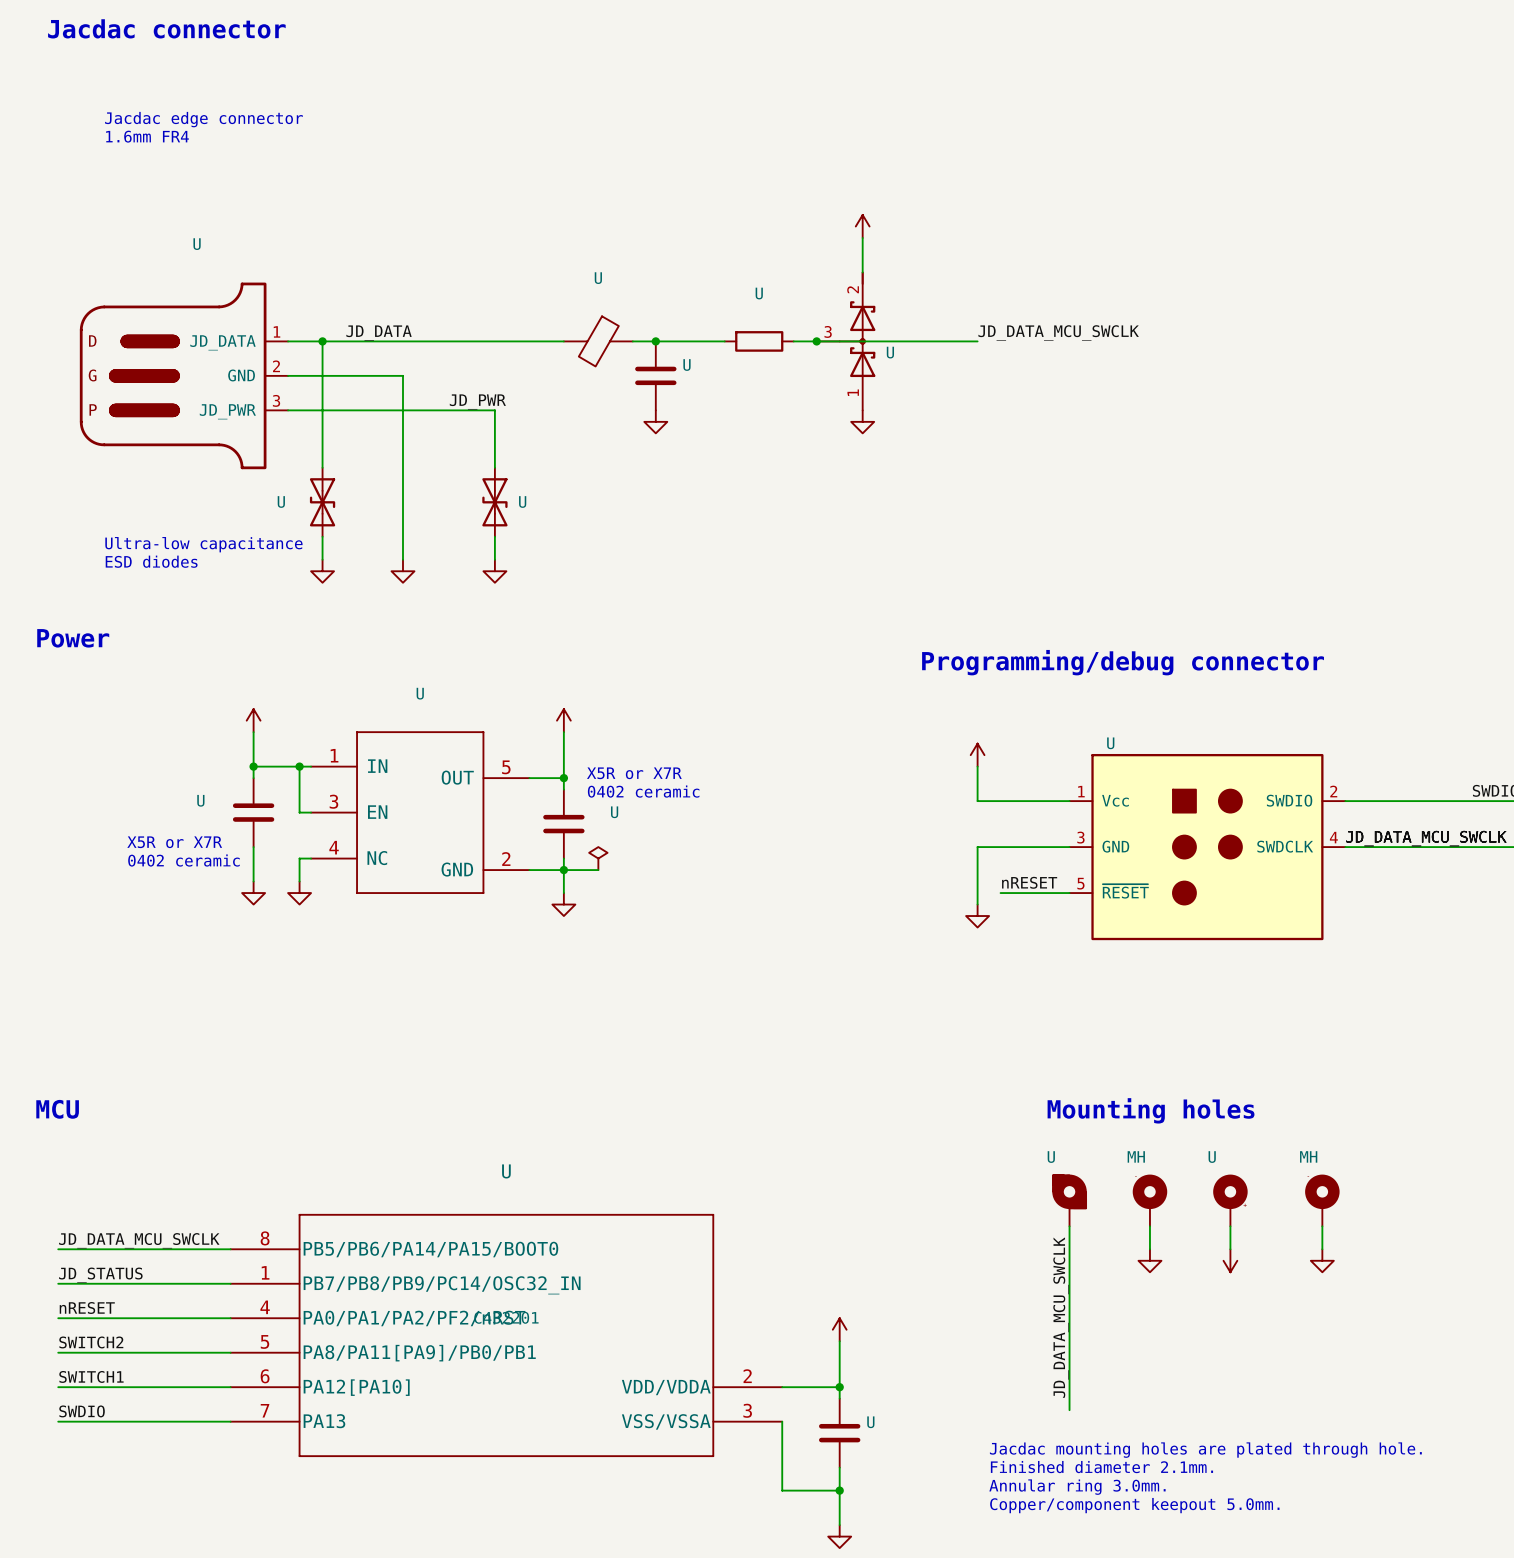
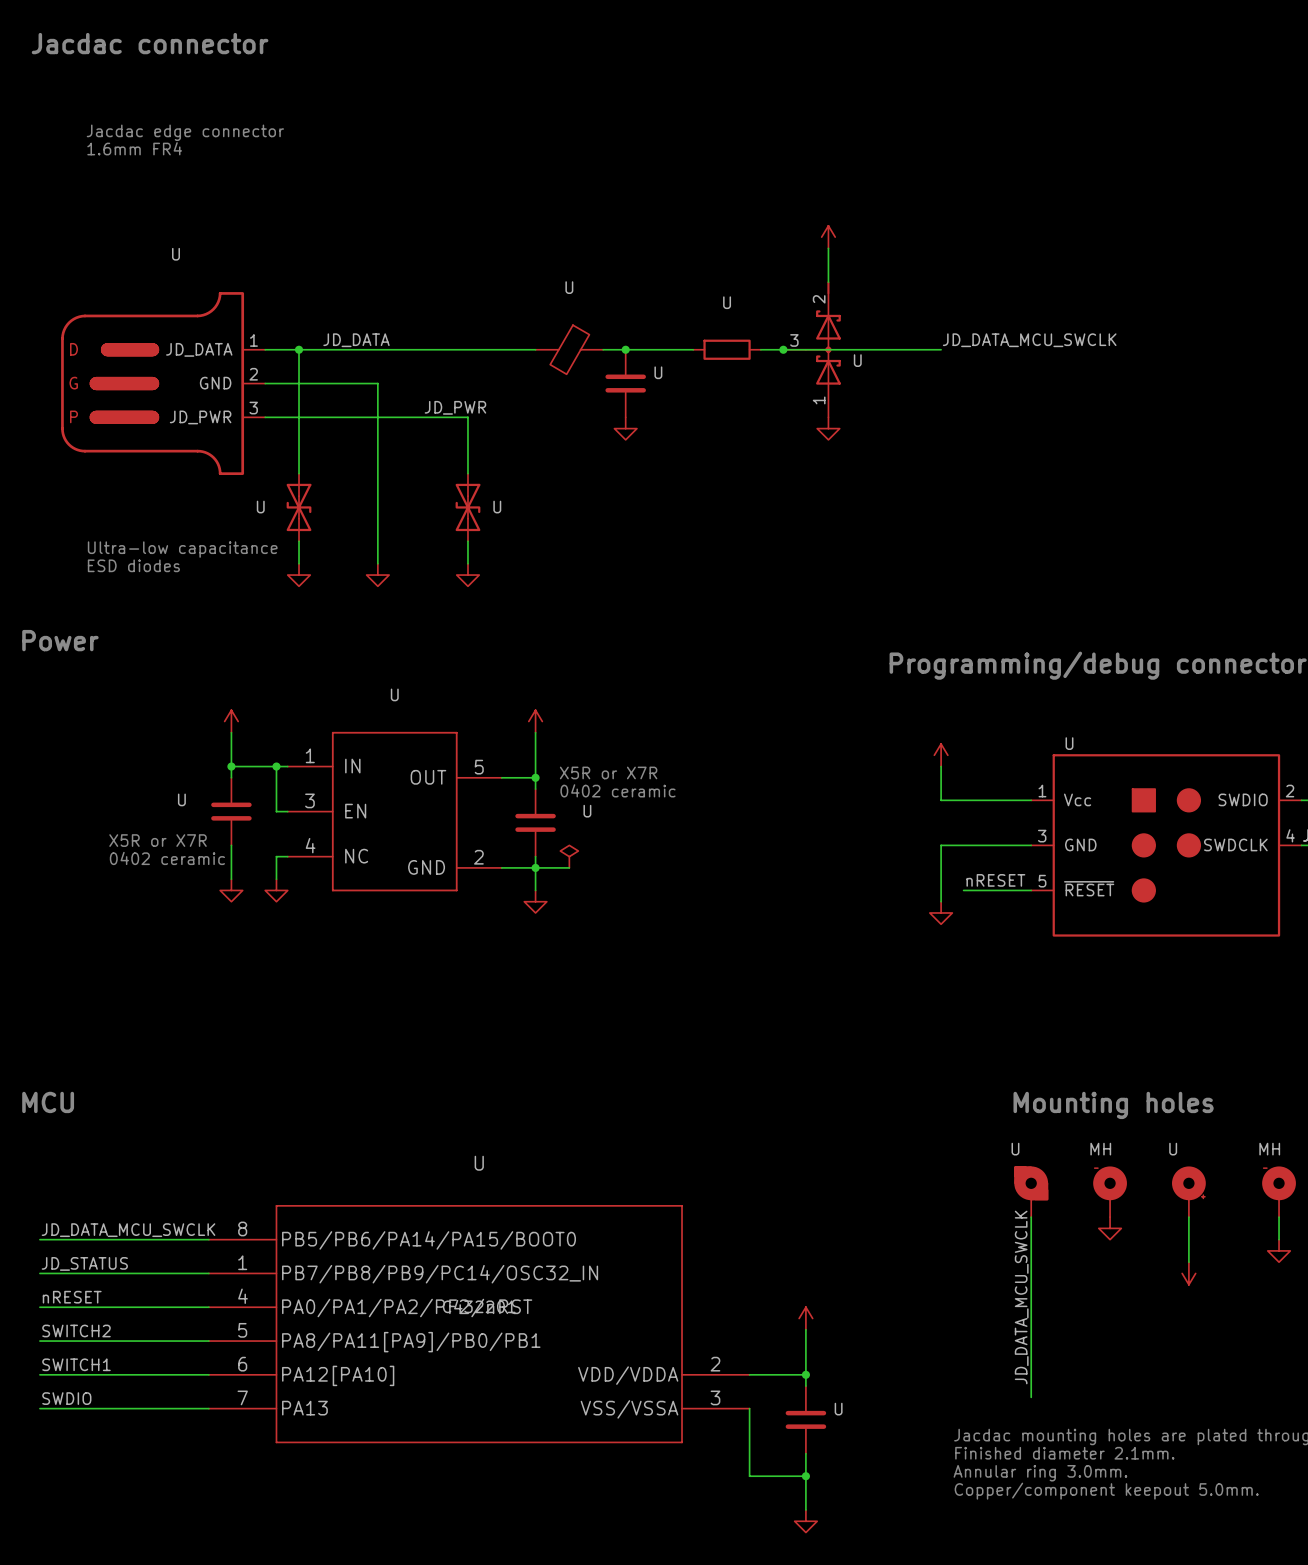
power symbol position: (1149, 1260) -> (1110, 1228)
power symbol position: (1230, 1260) -> (1188, 1273)

